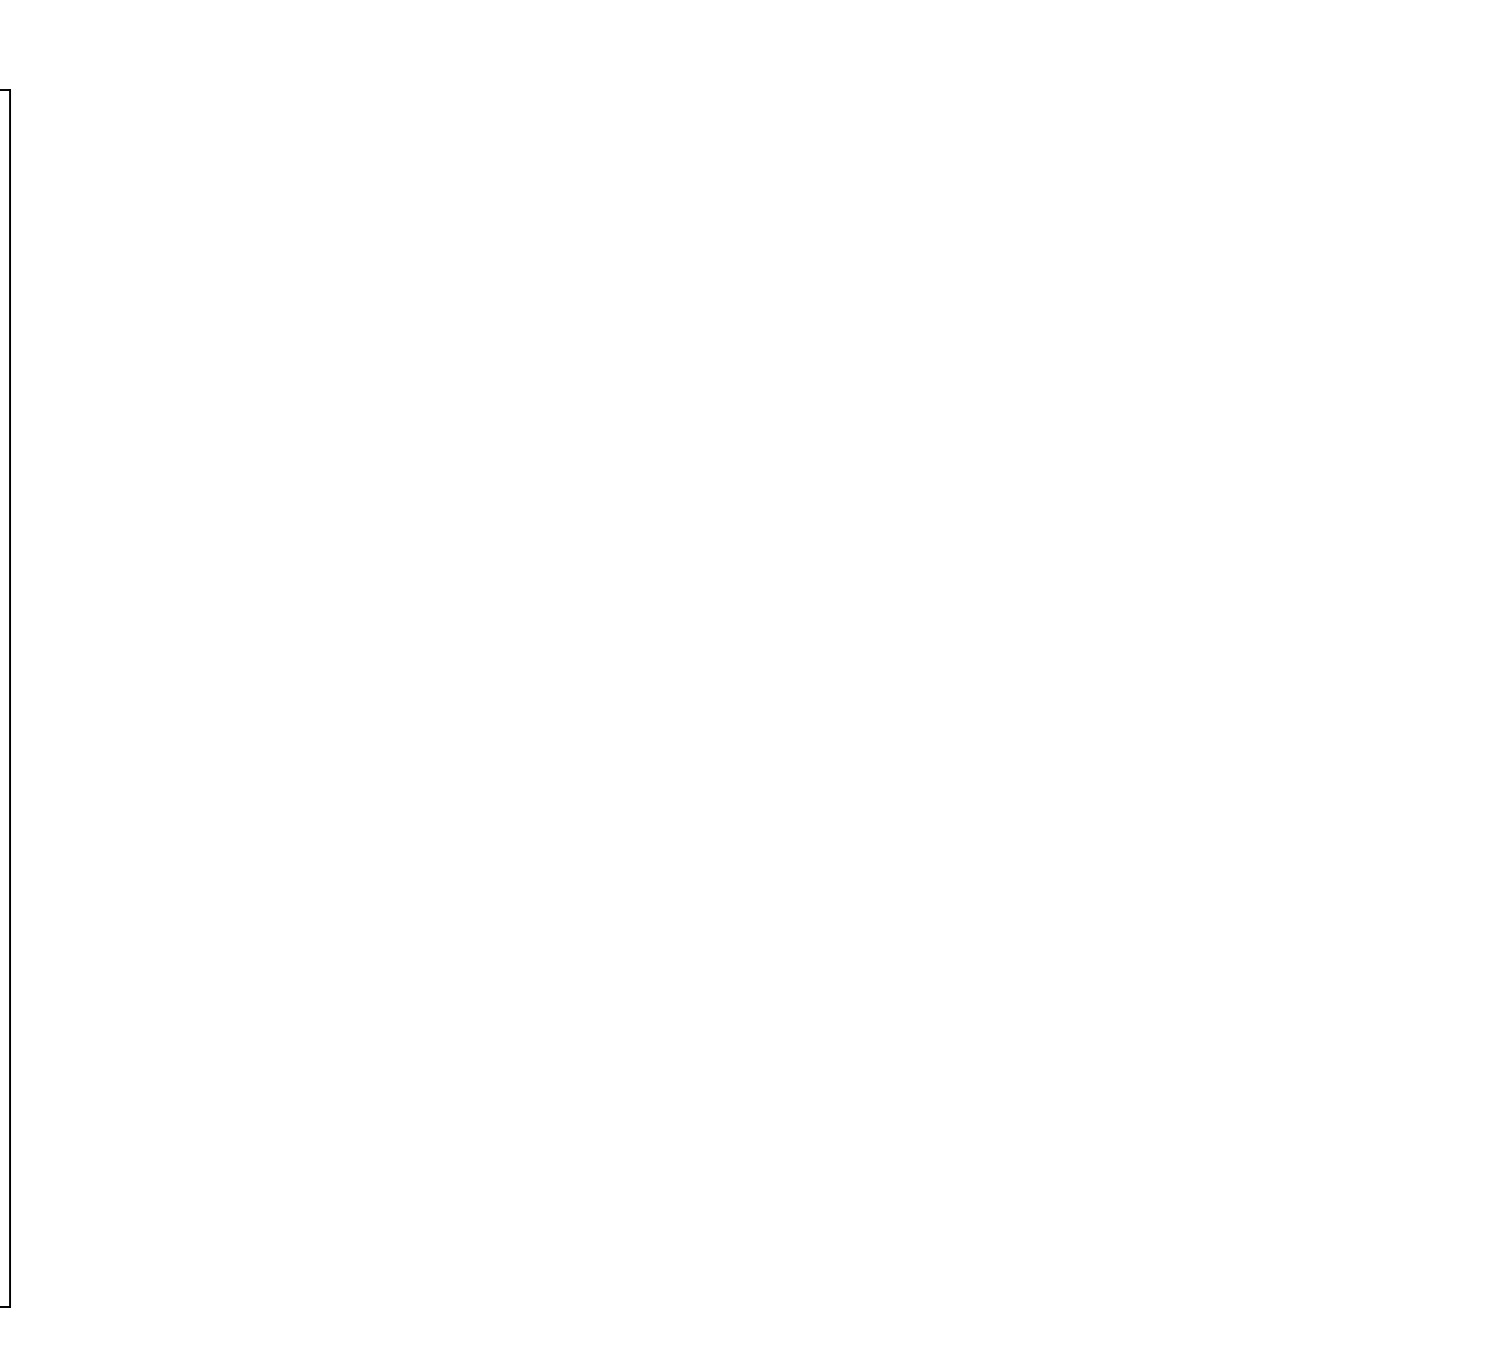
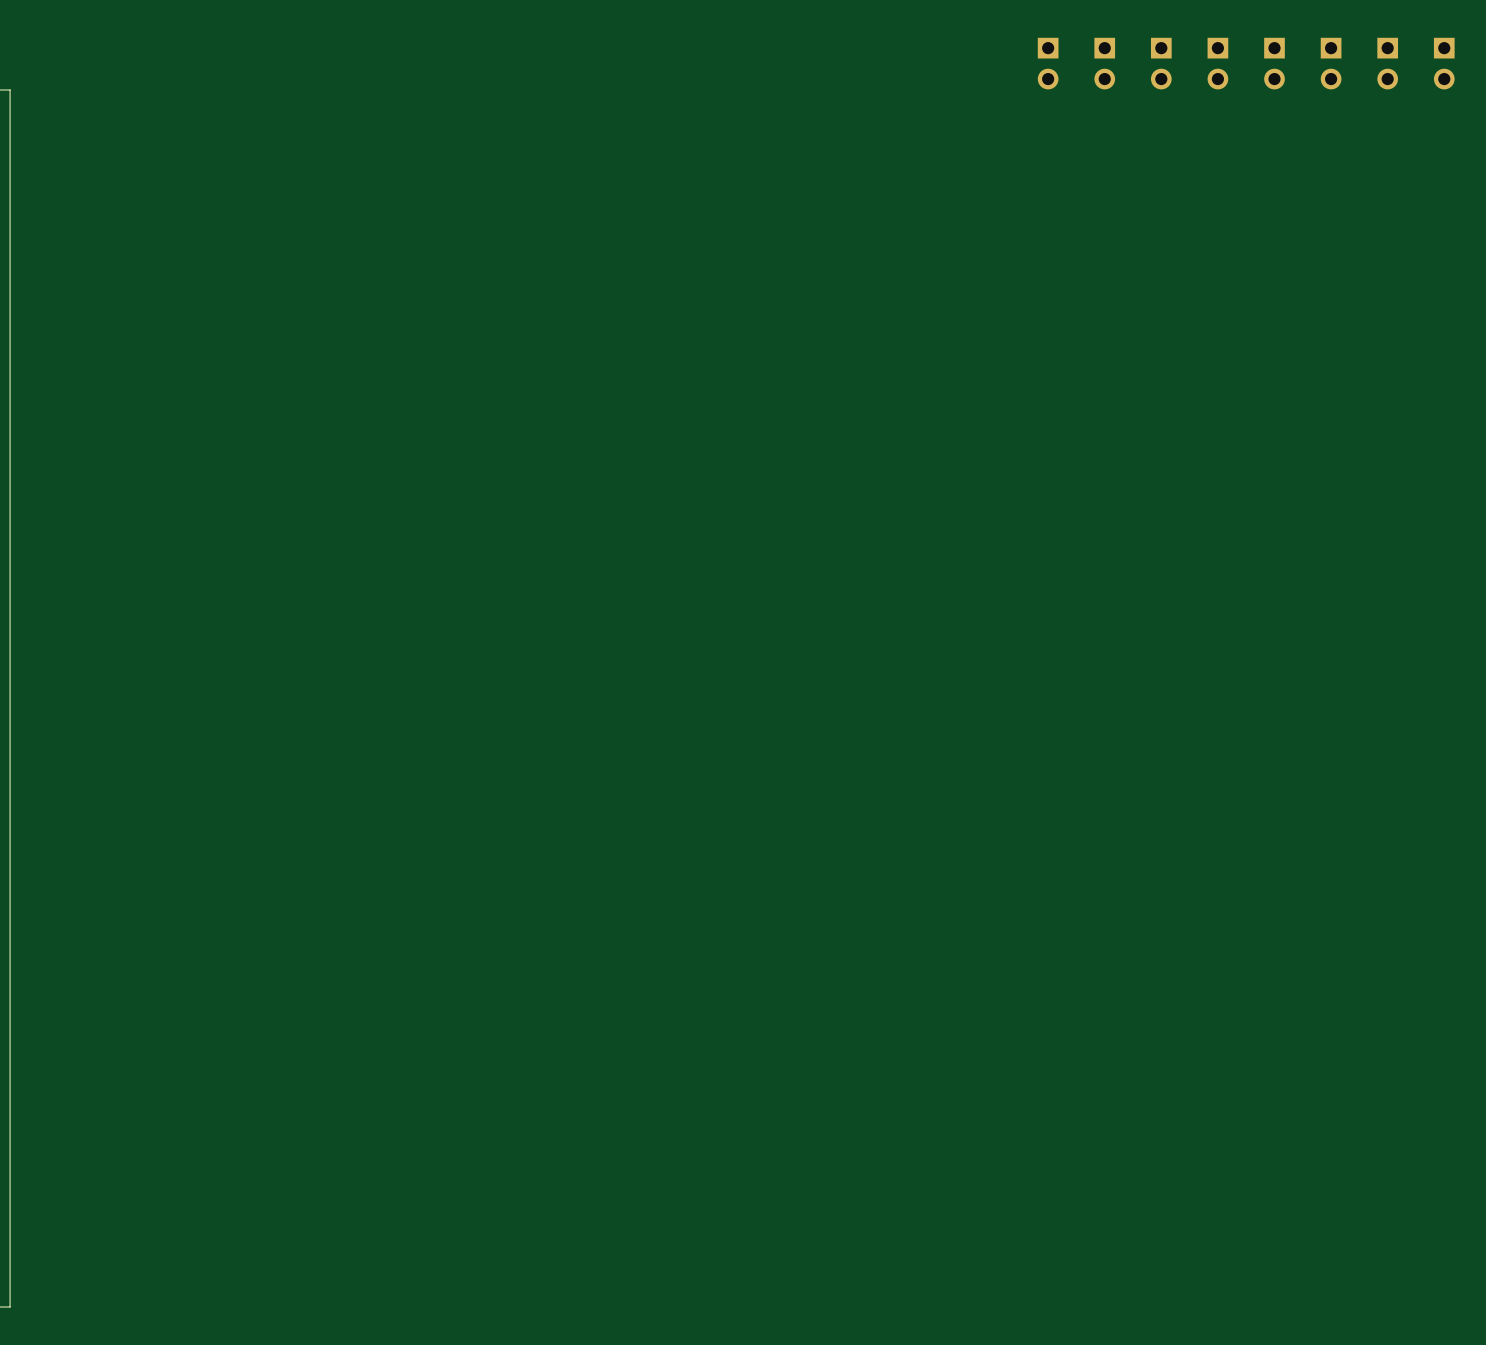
part: none -> (1048, 63)
part: none -> (1104, 63)
part: none -> (1161, 63)
part: none -> (1217, 63)
part: none -> (1274, 63)
part: none -> (1331, 63)
part: none -> (1387, 63)
part: none -> (1444, 63)

